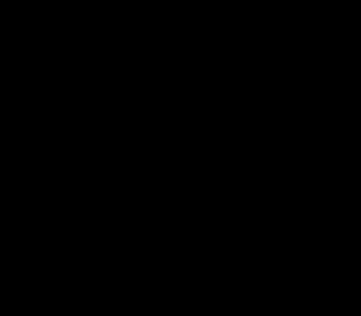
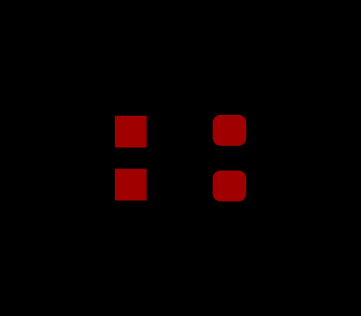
part: none -> (130, 158)
part: none -> (229, 158)

